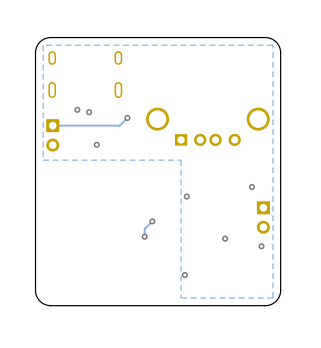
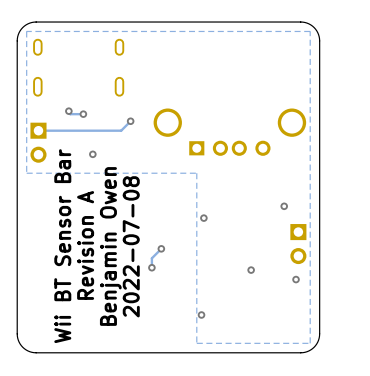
track: none -> (66, 110) (70, 114) (83, 114)
text: none -> Revision A (85, 245)
text: none -> Wii BT Sensor Bar (62, 246)
text: none -> Benjamin Owen (110, 246)
text: none -> 2022-07-08 (131, 246)

